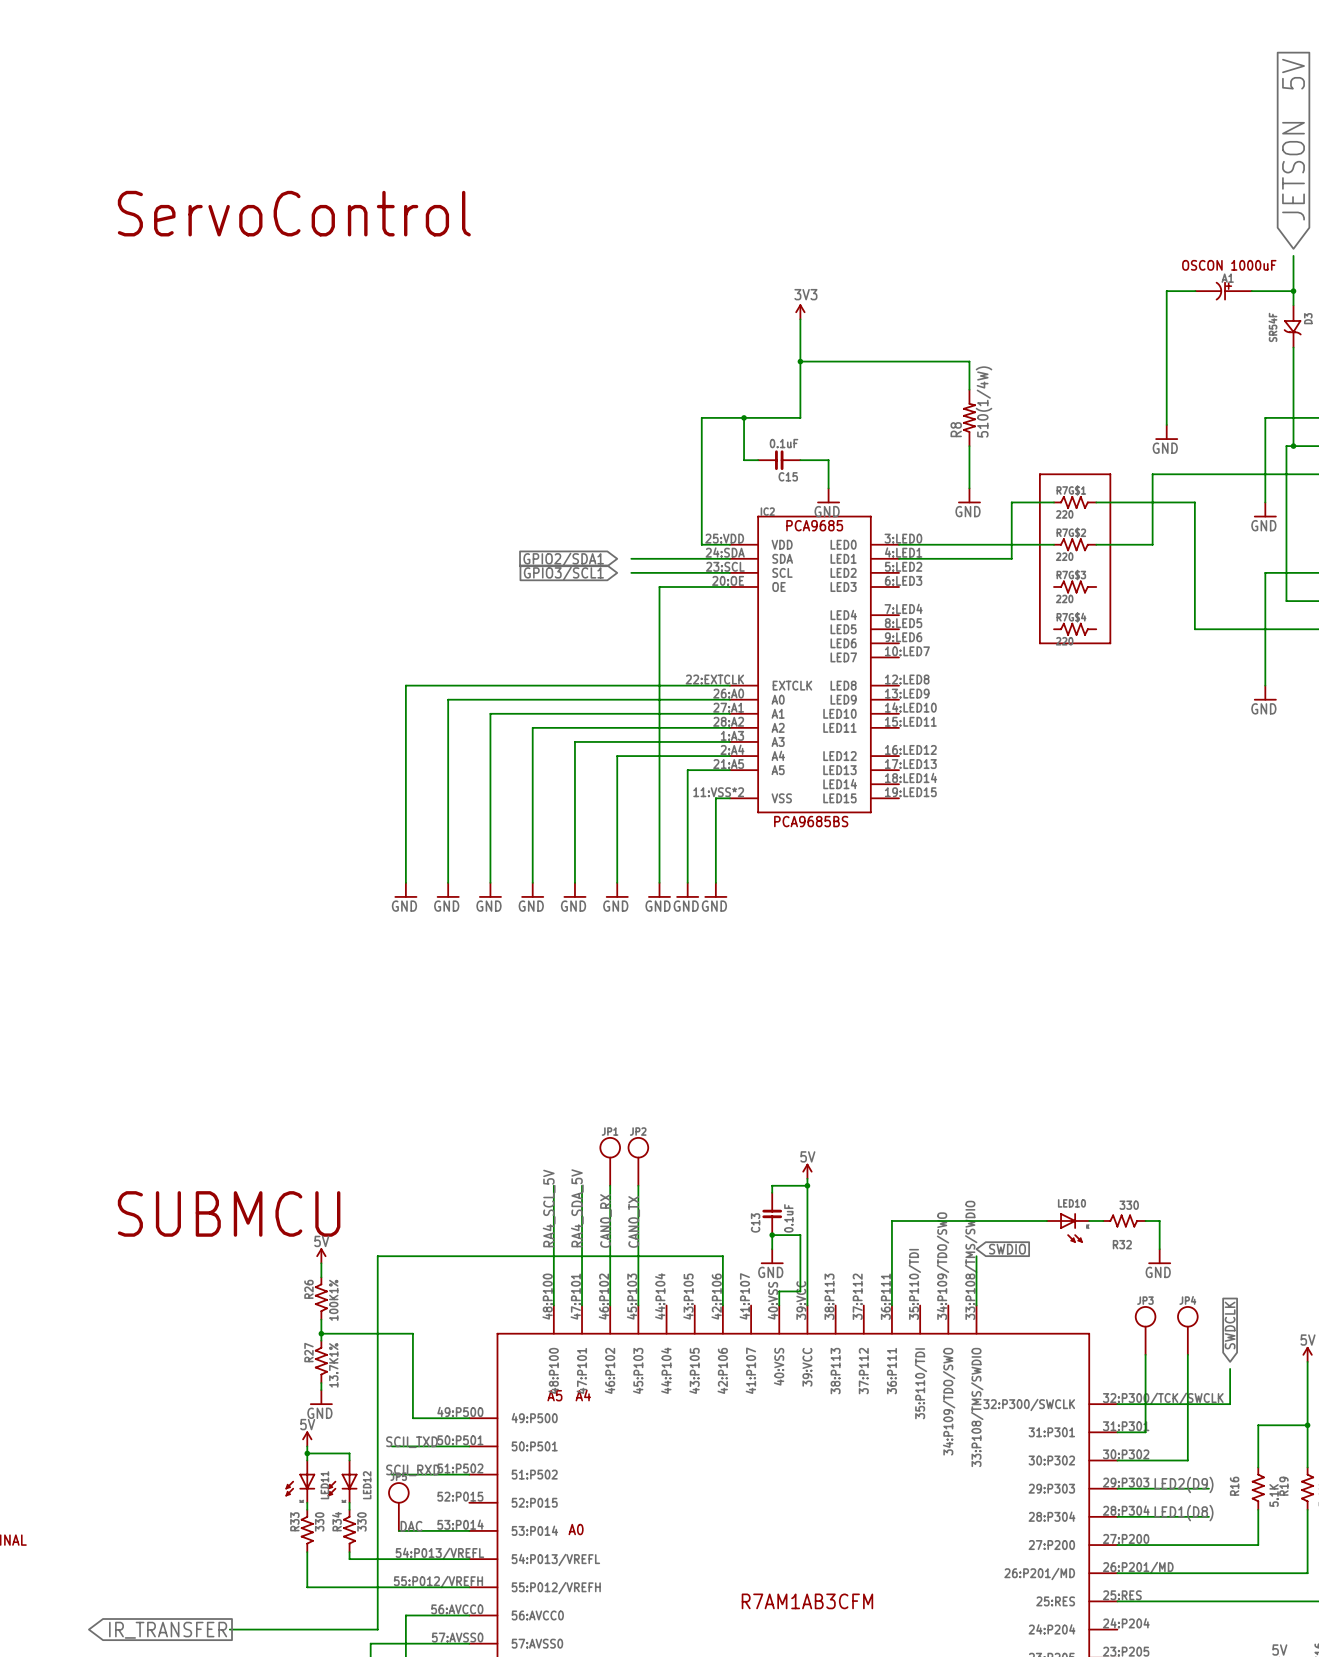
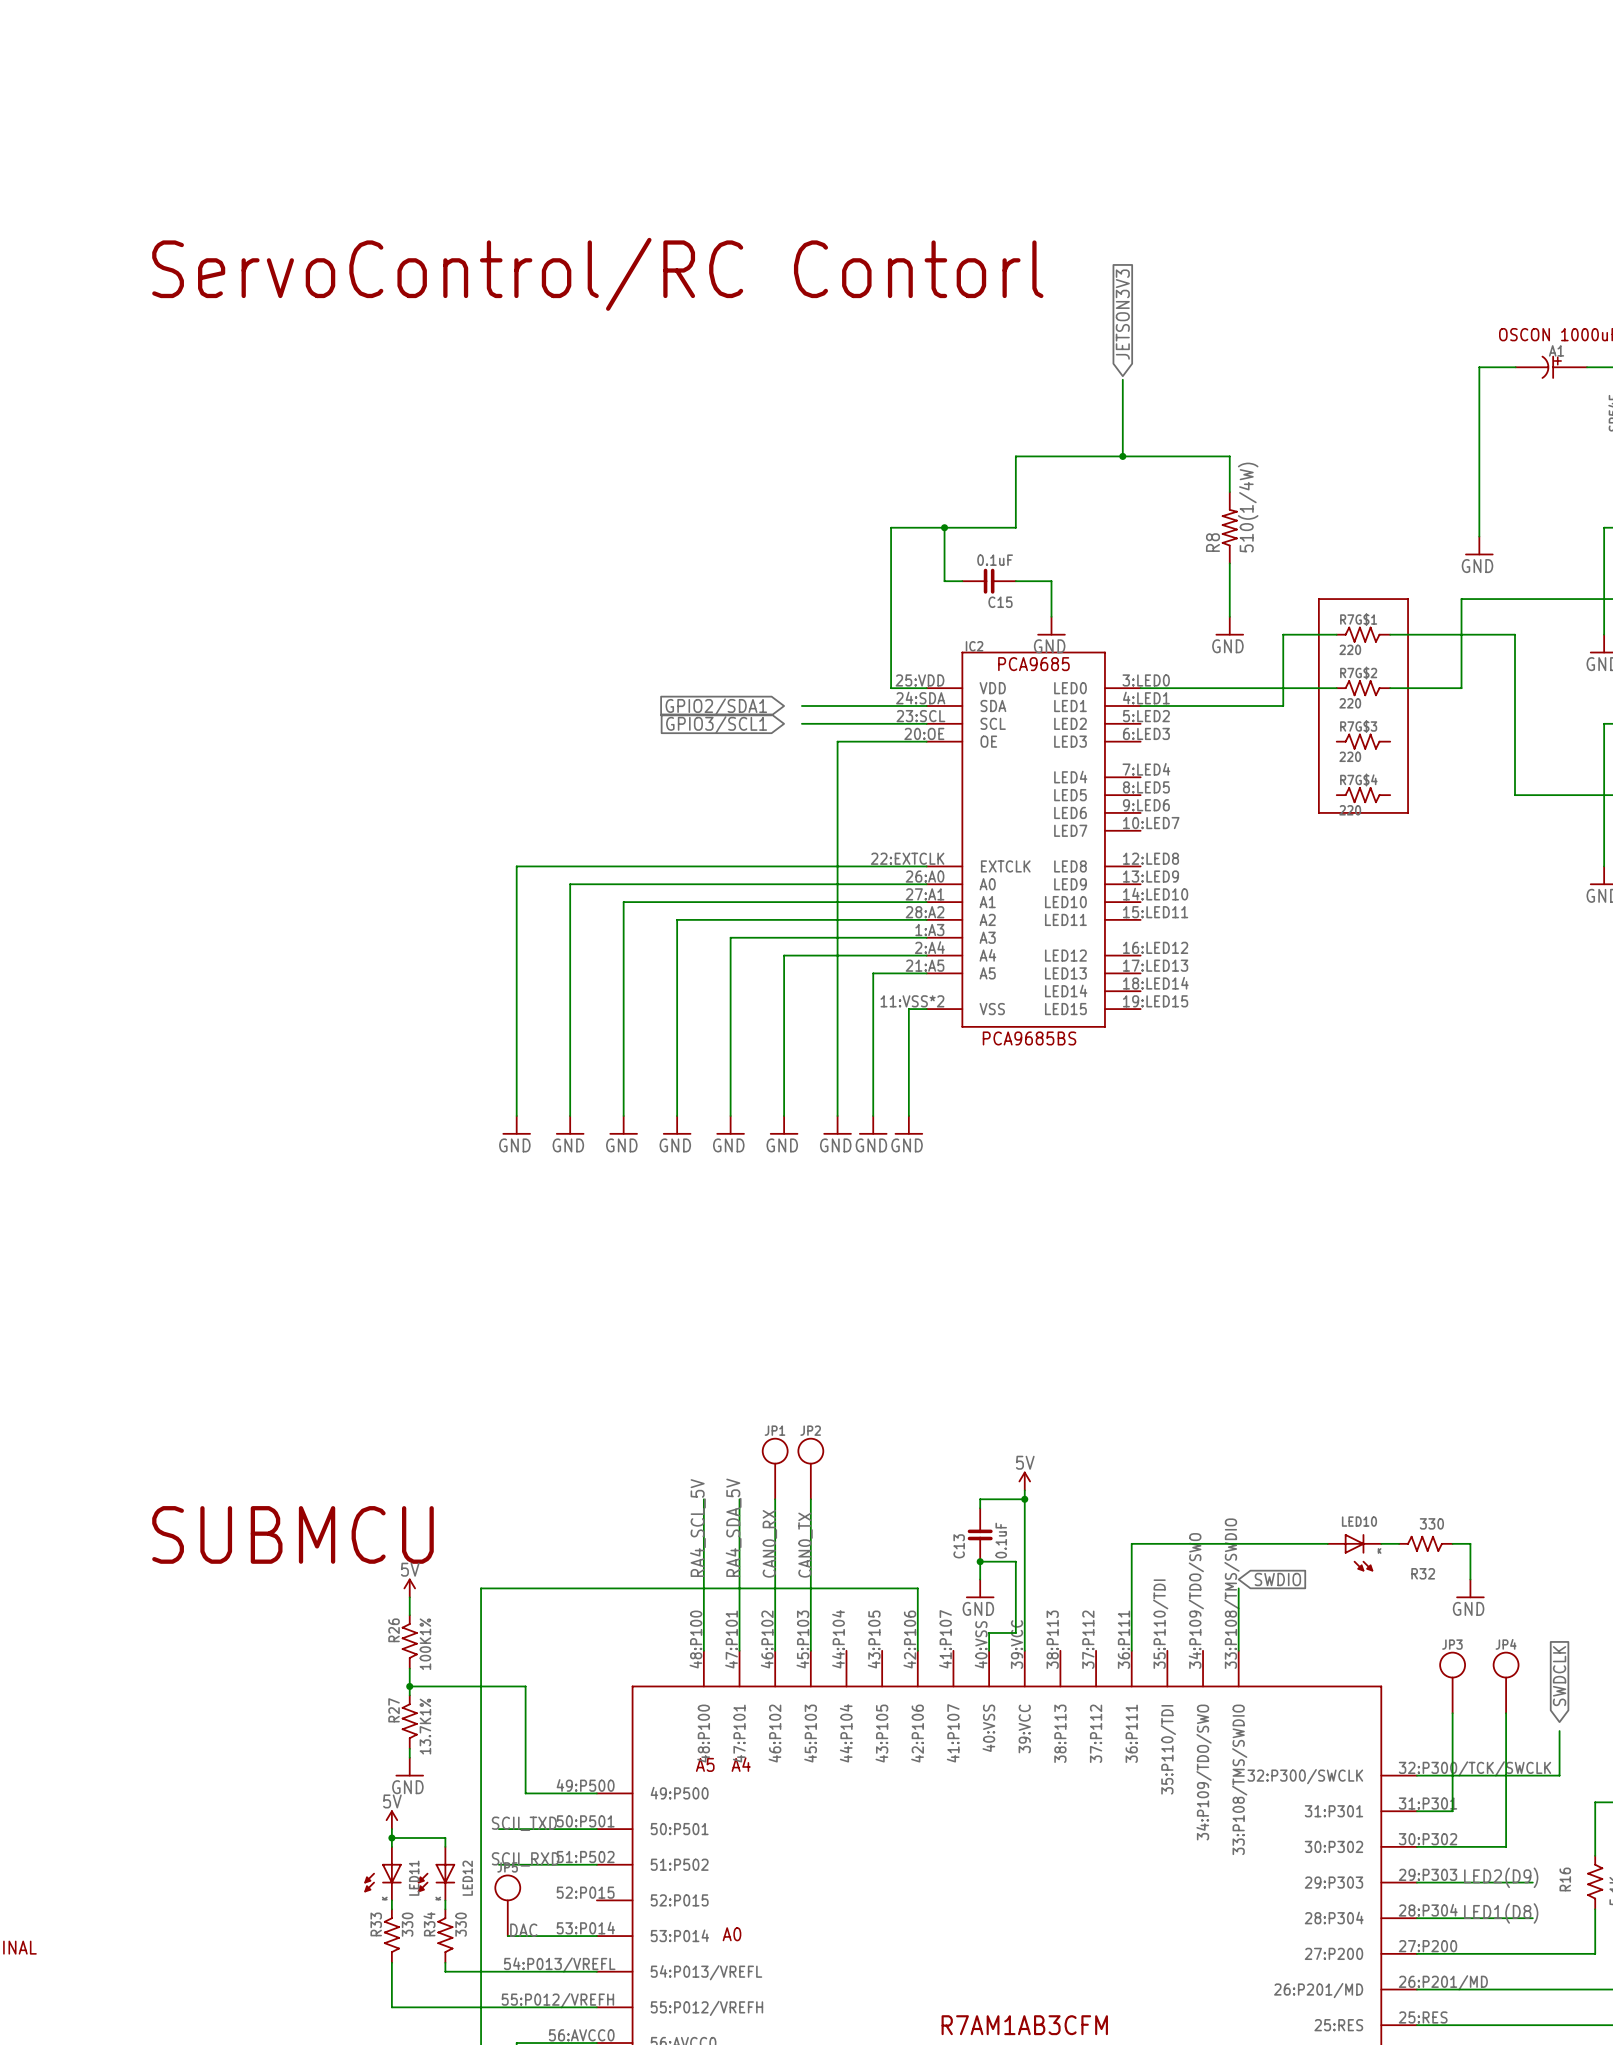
text: ServoControl (294, 213) -> ServoControl/RC Contorl (597, 274)
global label: none -> JETSON3V3 (1122, 314)
wire: none -> (1122, 379) (1122, 456)
power symbol: 3V3 (800, 311) -> none
wire: (800, 319) (800, 361) -> none
junction: (800, 361) -> none
junction: none -> (1122, 456)

